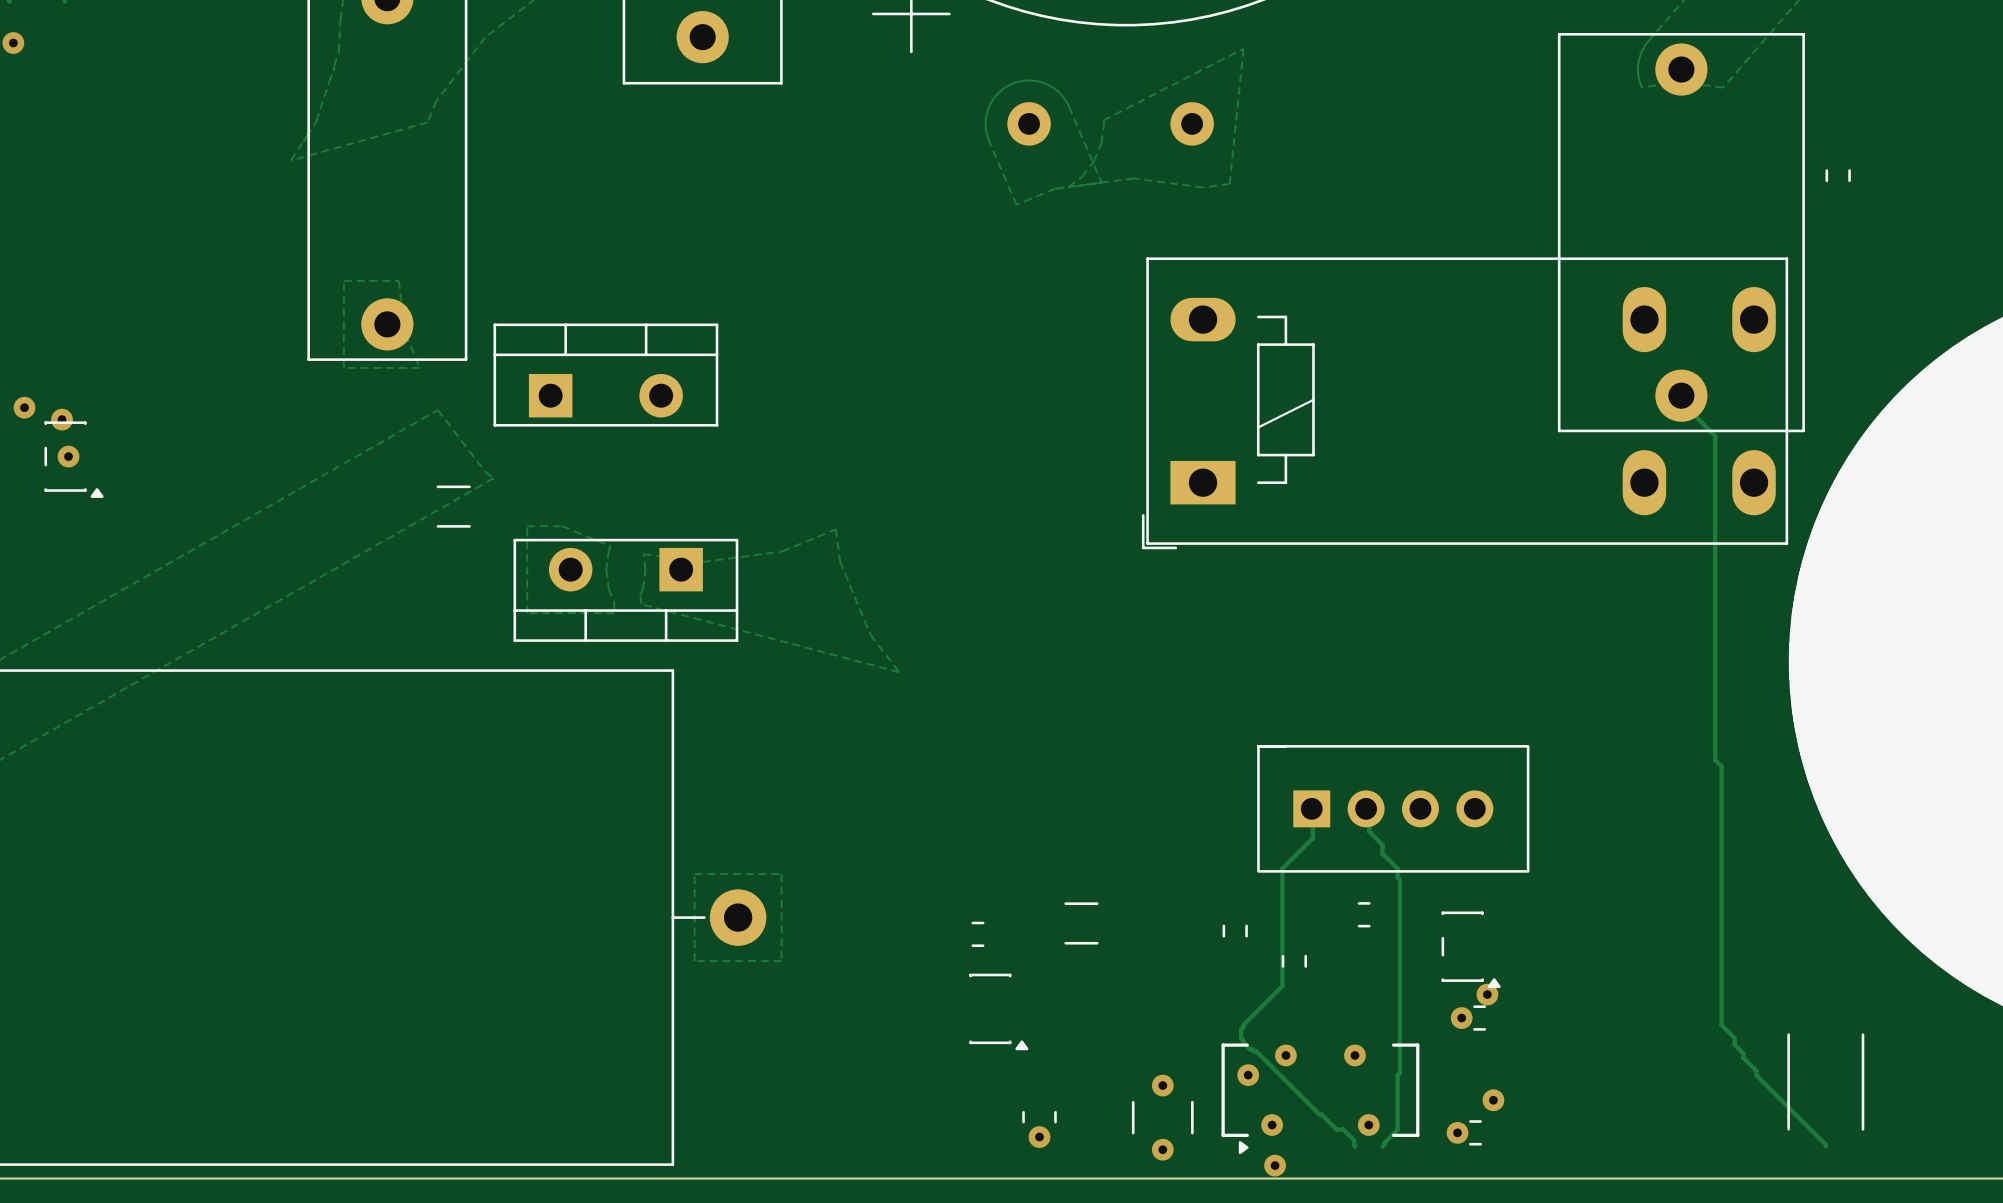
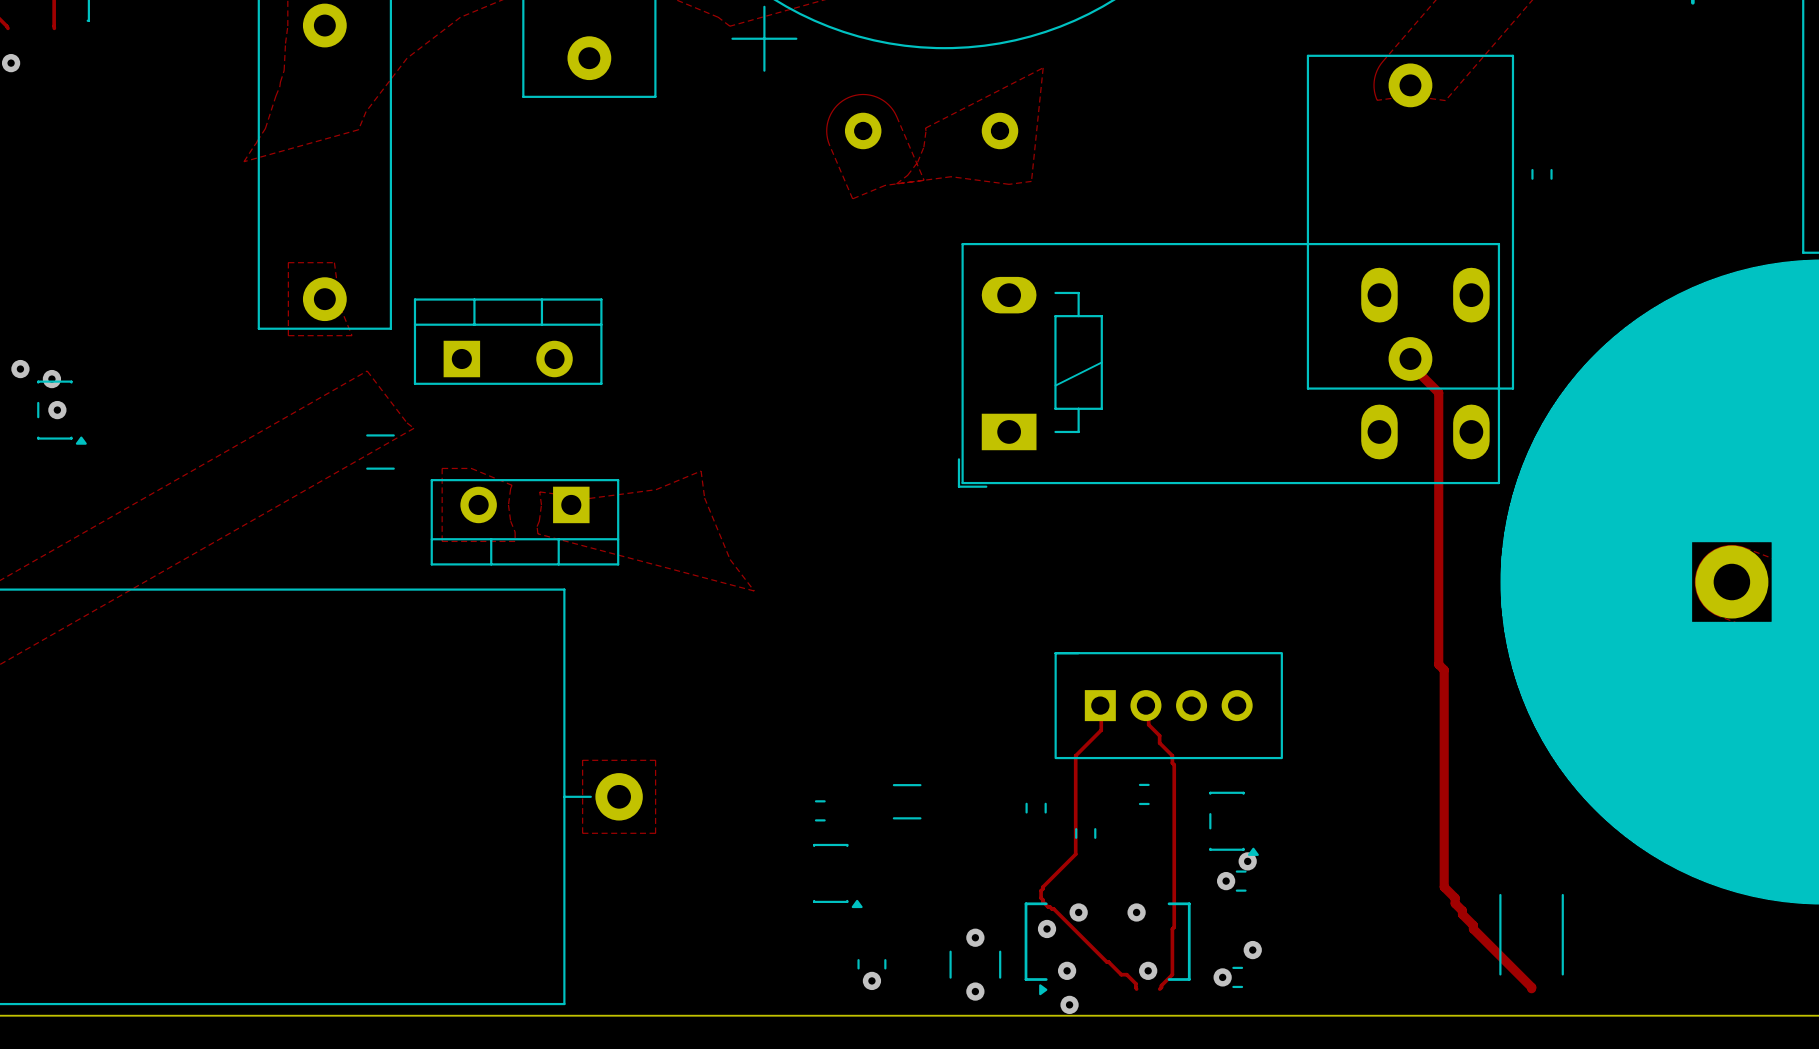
track width: thin (1681, 395) (1691, 405) (1691, 412) (1715, 435) (1715, 759) (1721, 766) (1721, 1025) (1734, 1038) (1734, 1044) (1743, 1053) (1743, 1057) (1756, 1070) (1756, 1075) (1825, 1146) -> thick (1410, 359) (1418, 367) (1418, 372) (1438, 392) (1438, 664) (1444, 670) (1444, 887) (1455, 898) (1455, 903) (1473, 925) (1473, 929) (1531, 988)

